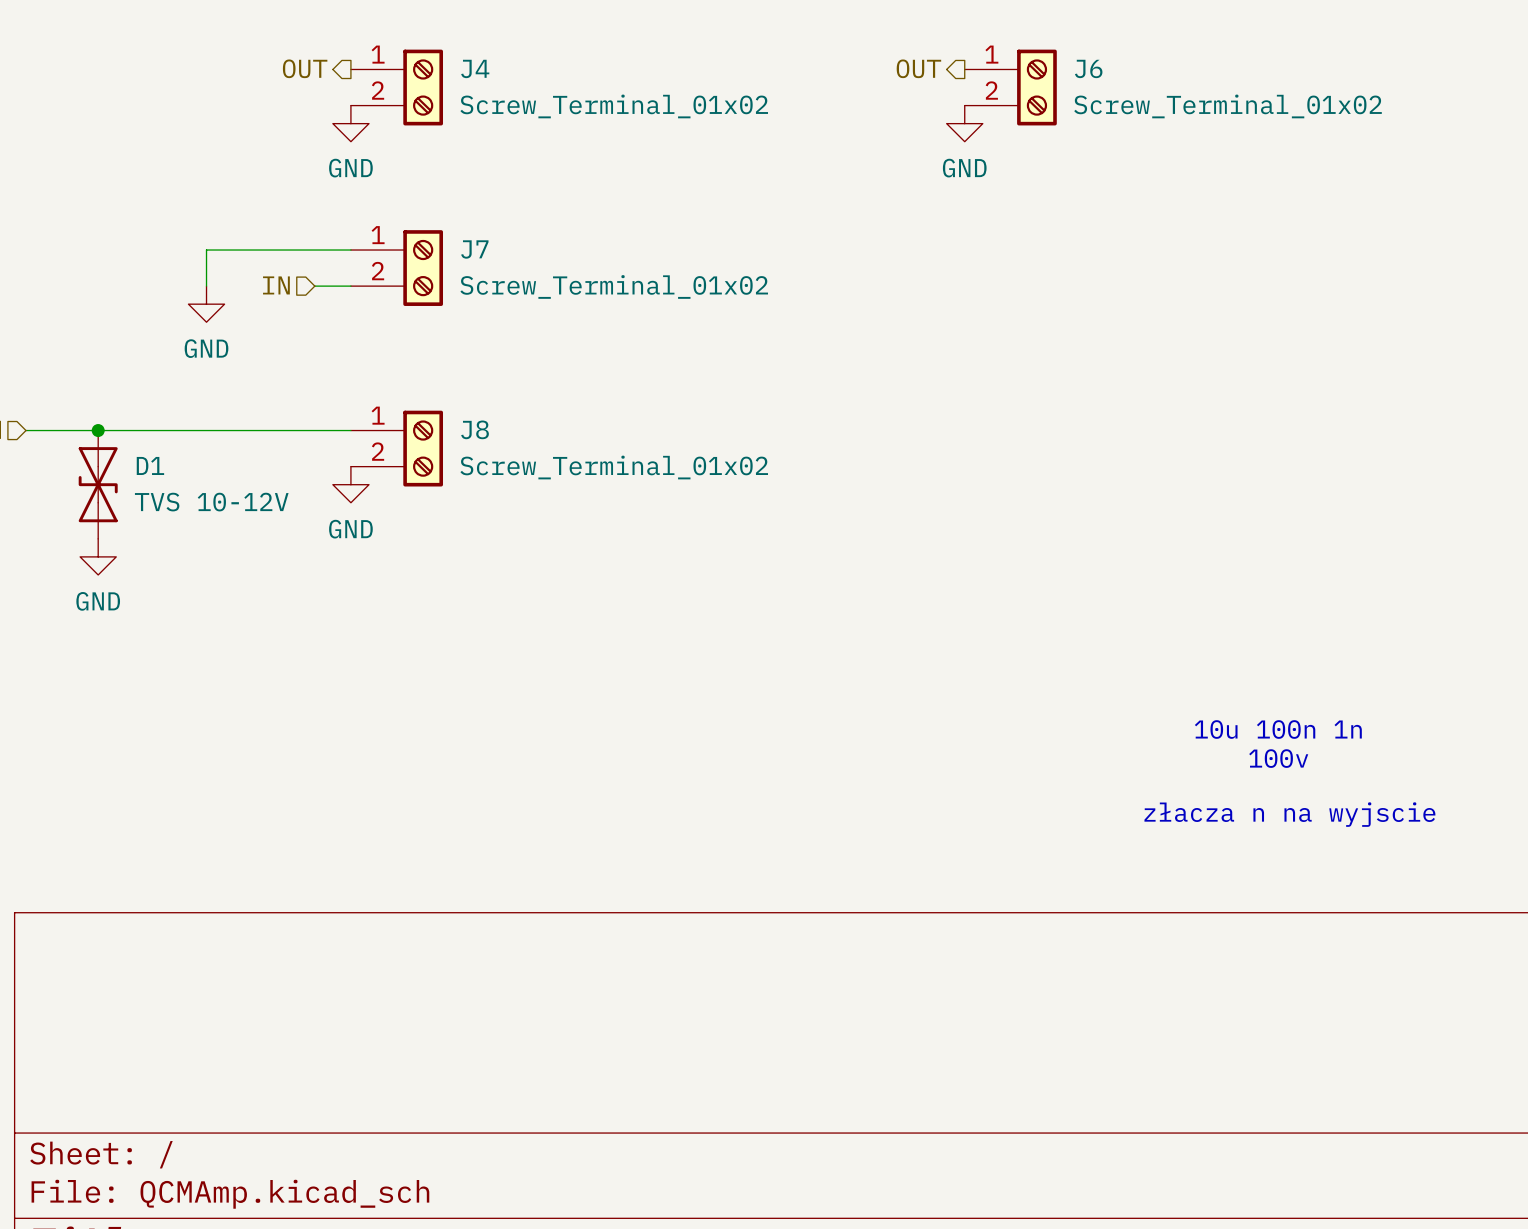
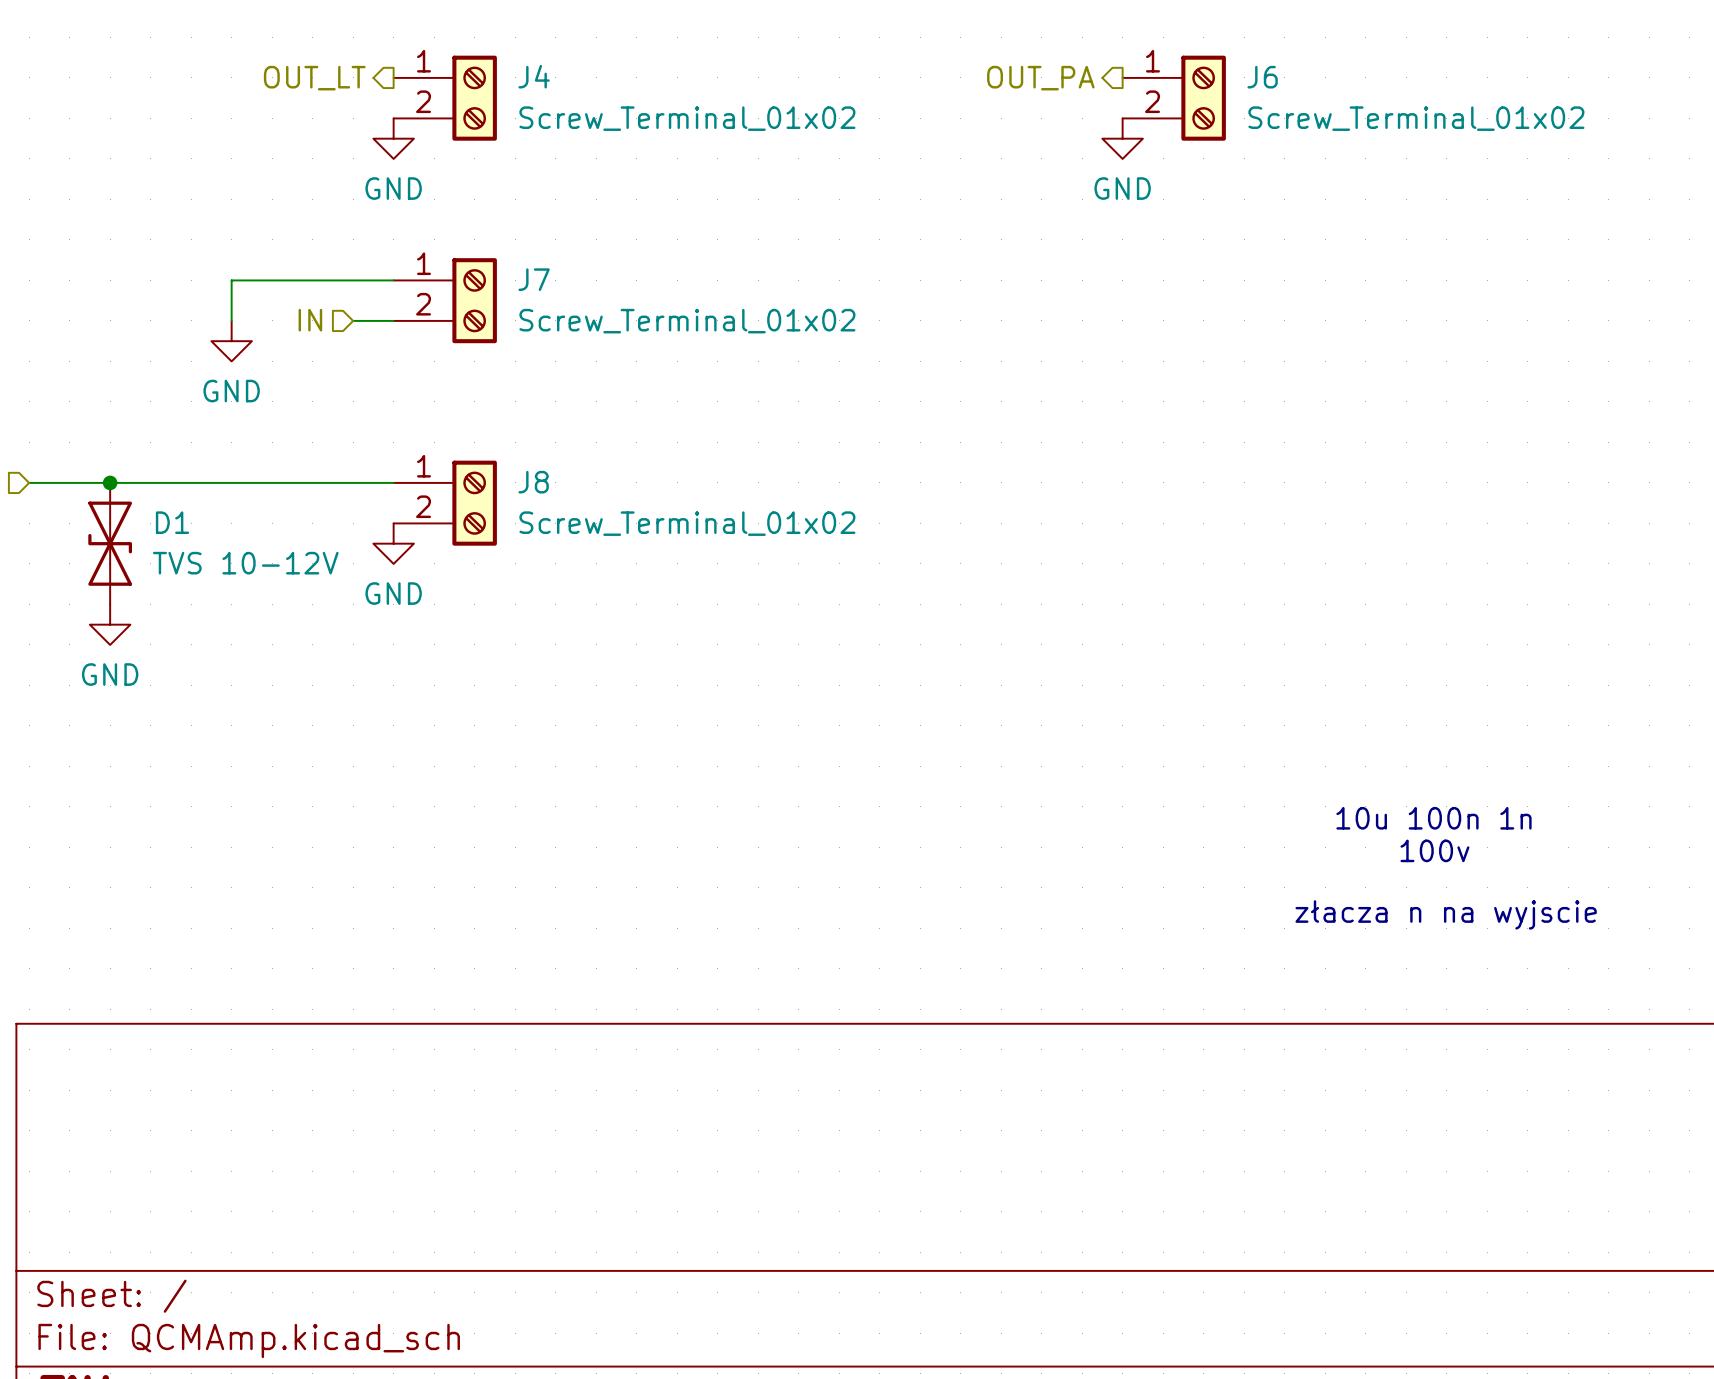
hierarchical label: OUT (305, 68) -> OUT_LT (314, 78)
hierarchical label: OUT (918, 68) -> OUT_PA (1040, 78)
J6 position: (1010, 87) -> (1174, 98)
power symbol position: GND (964, 123) -> GND (1122, 138)

